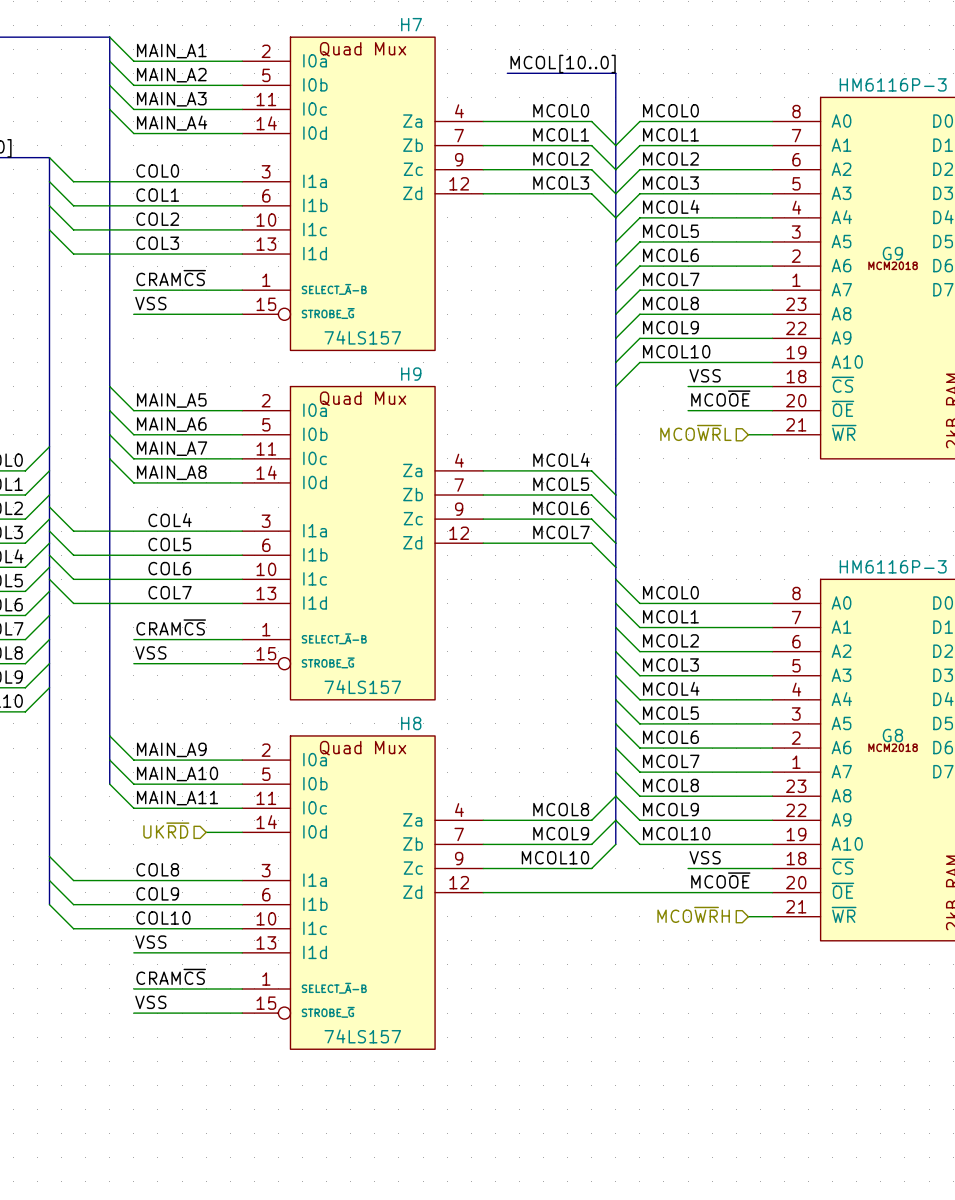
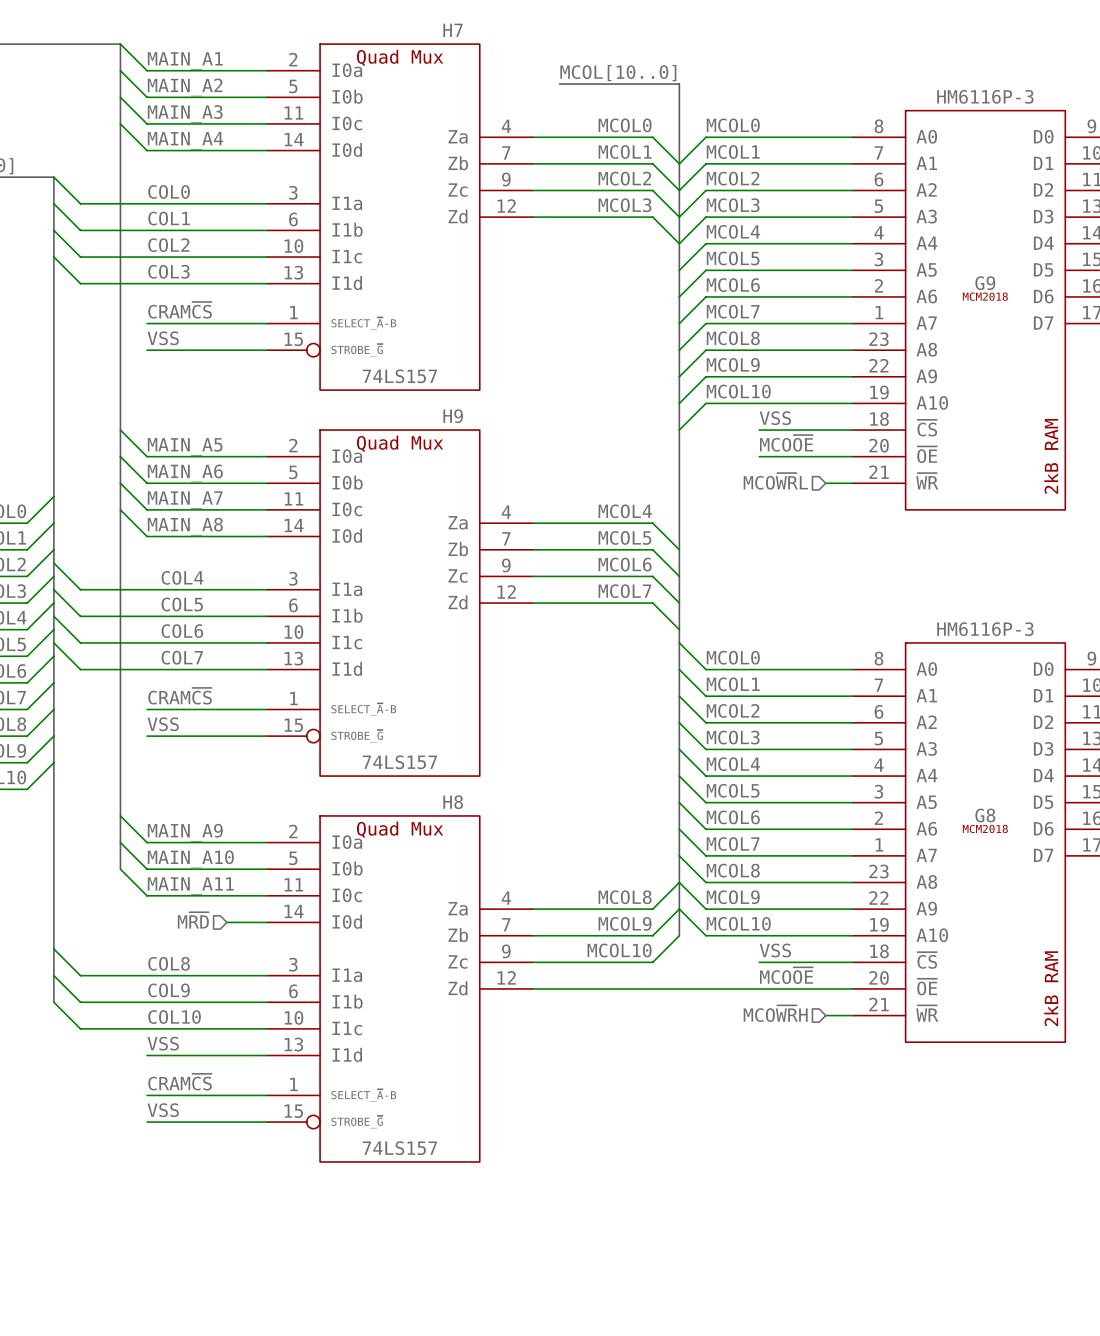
hierarchical label: UK~{RD} (166, 830) -> M~{RD} (193, 920)

